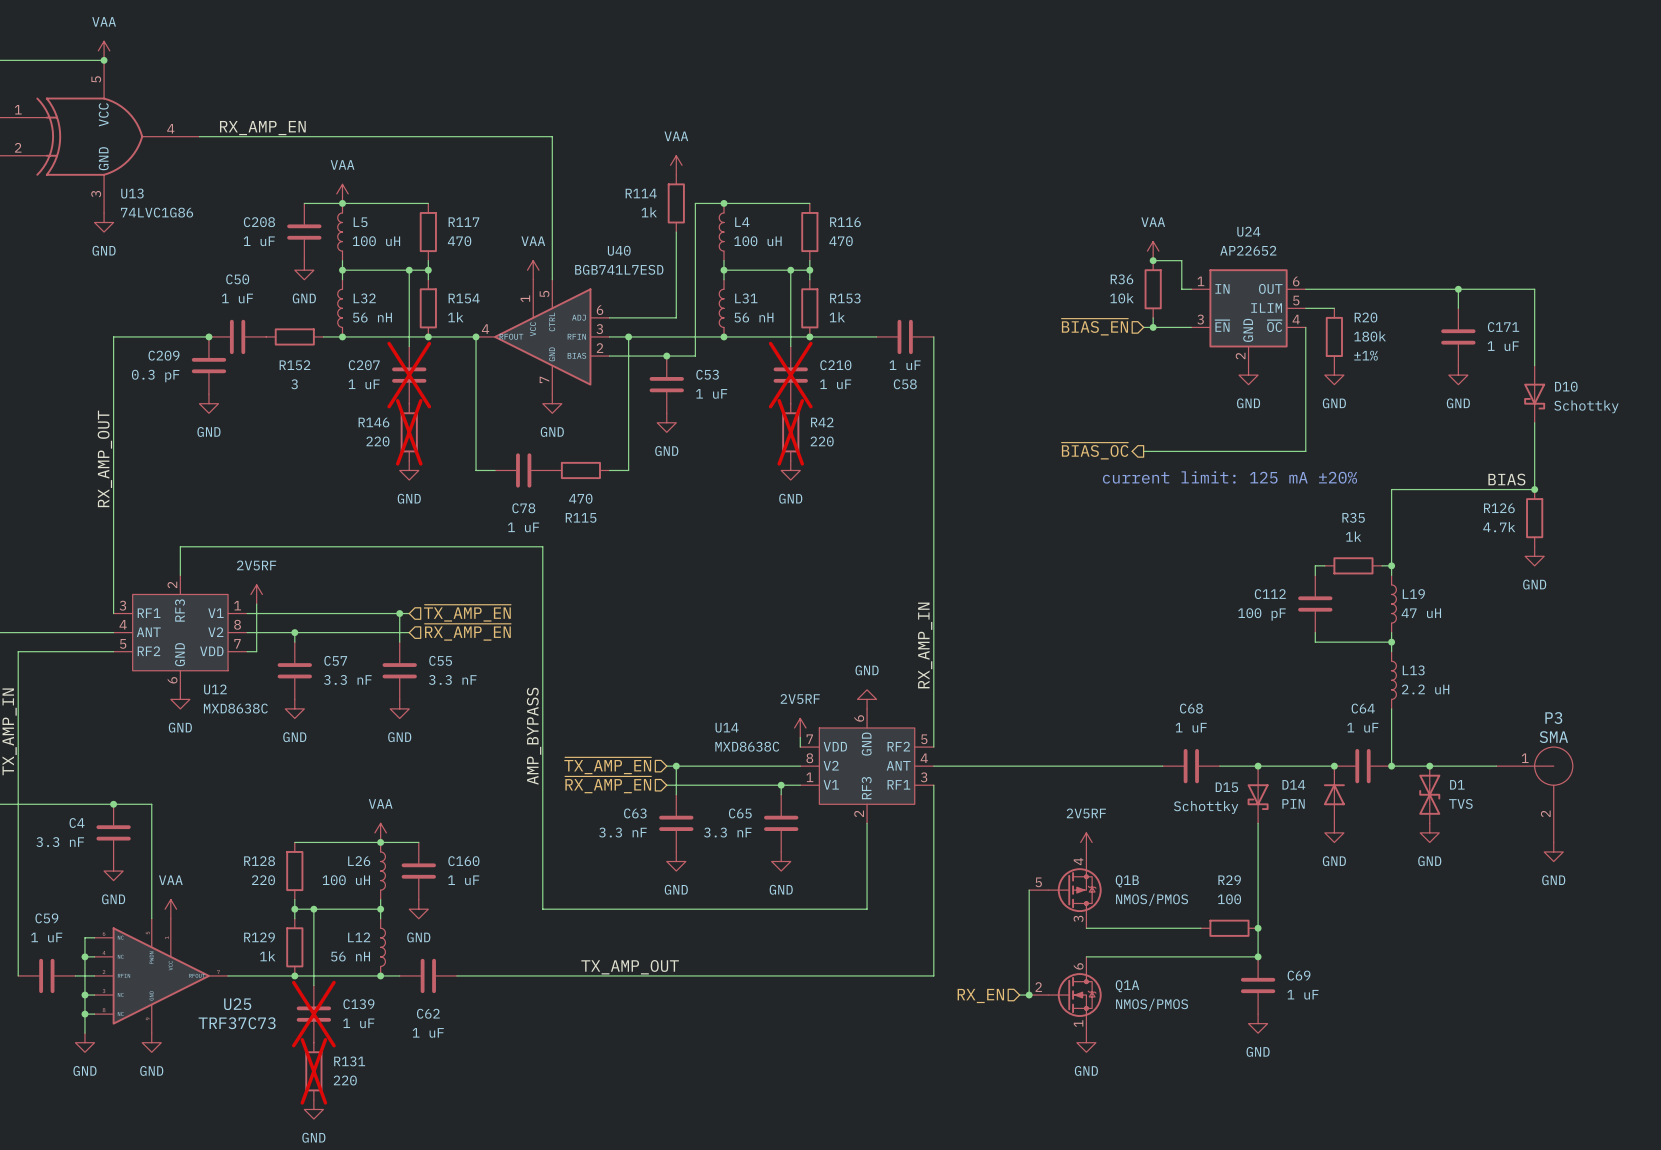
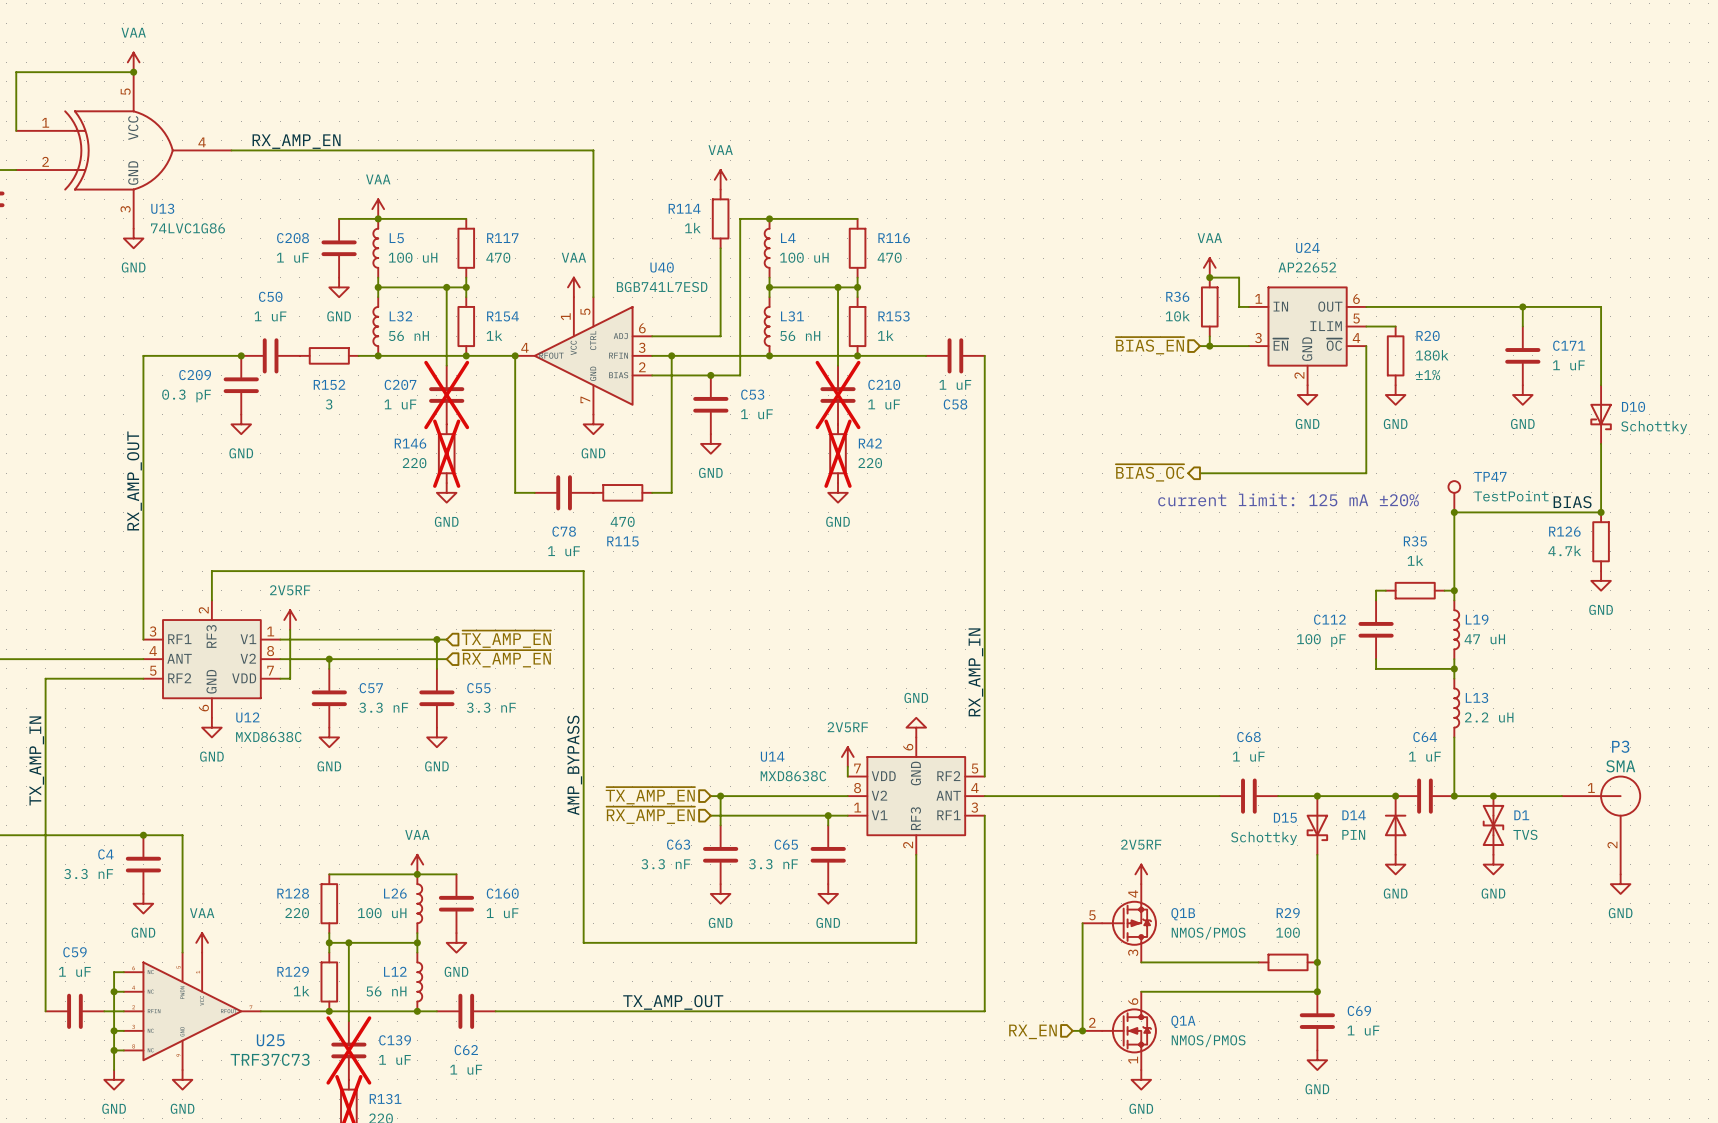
TP47: none -> TestPoint (1454, 496)
junction: none -> (1454, 512)

